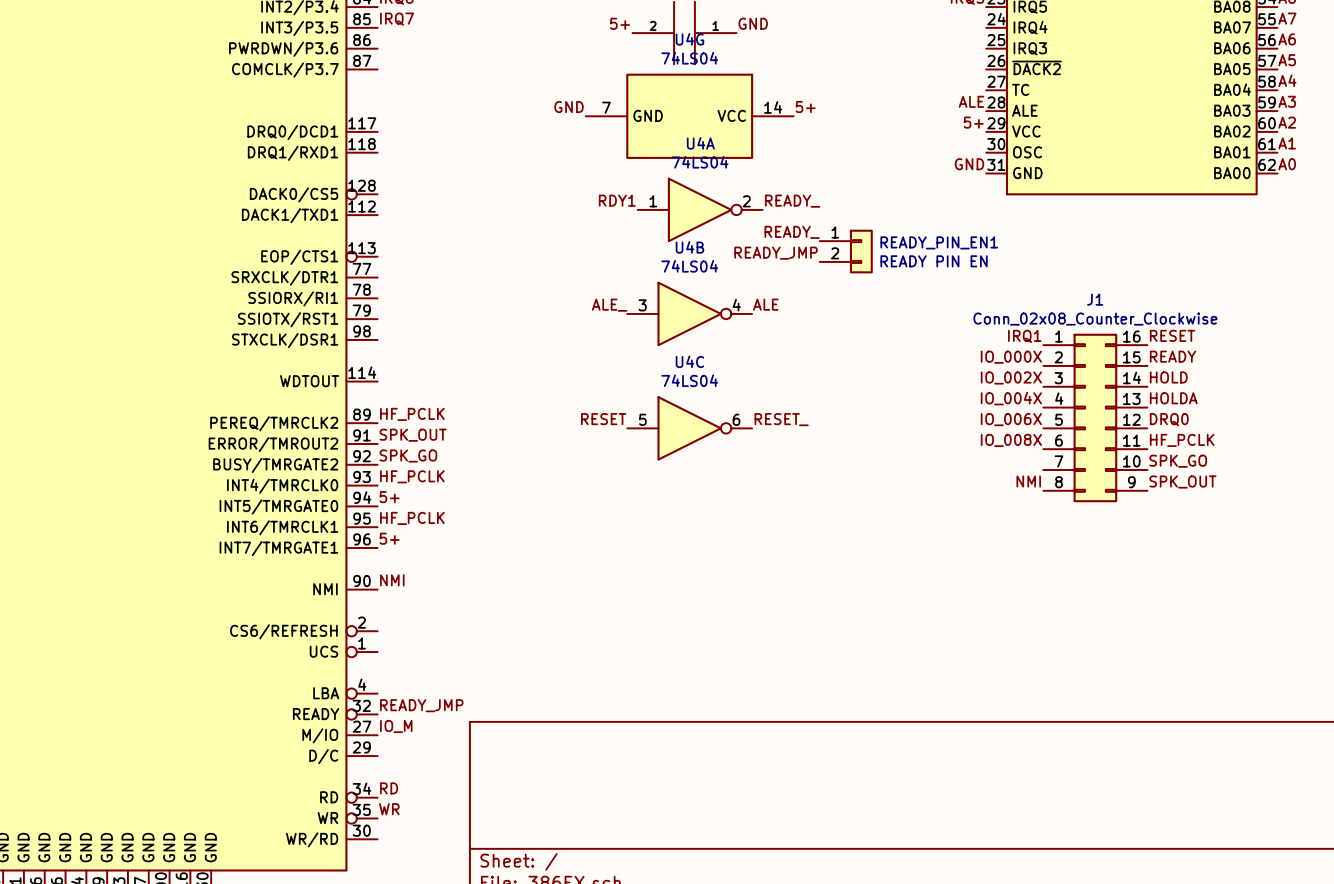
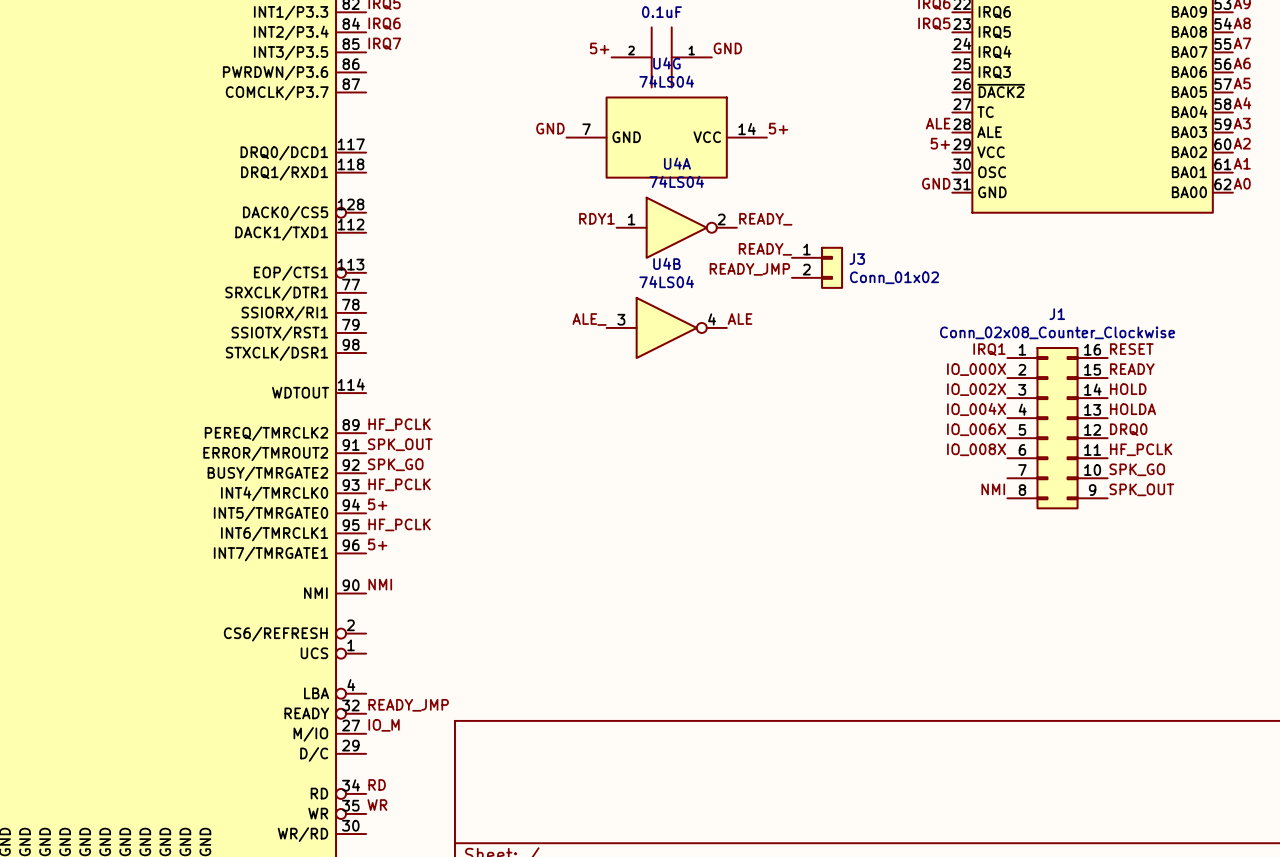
READY_PIN_EN1 name: READY_PIN_EN1 (939, 242) -> J3 (857, 259)
READY_PIN_EN1 value: READY PIN EN (934, 261) -> Conn_01x02 (894, 277)
label: RESET (603, 419) -> none
label: RESET_ (781, 419) -> none
U4C: 74LS04 (689, 428) -> none

